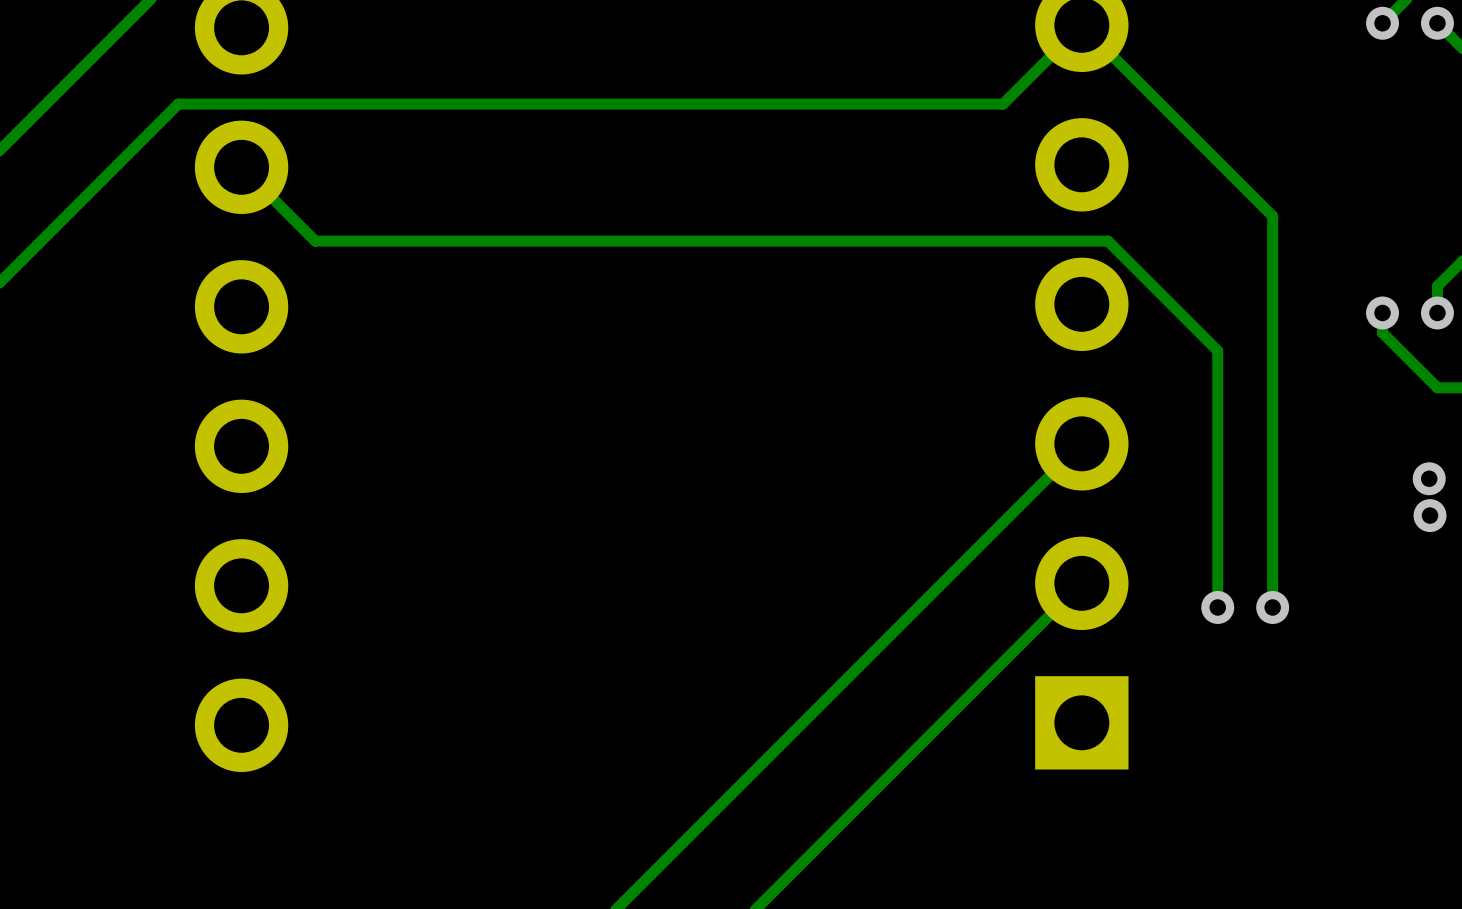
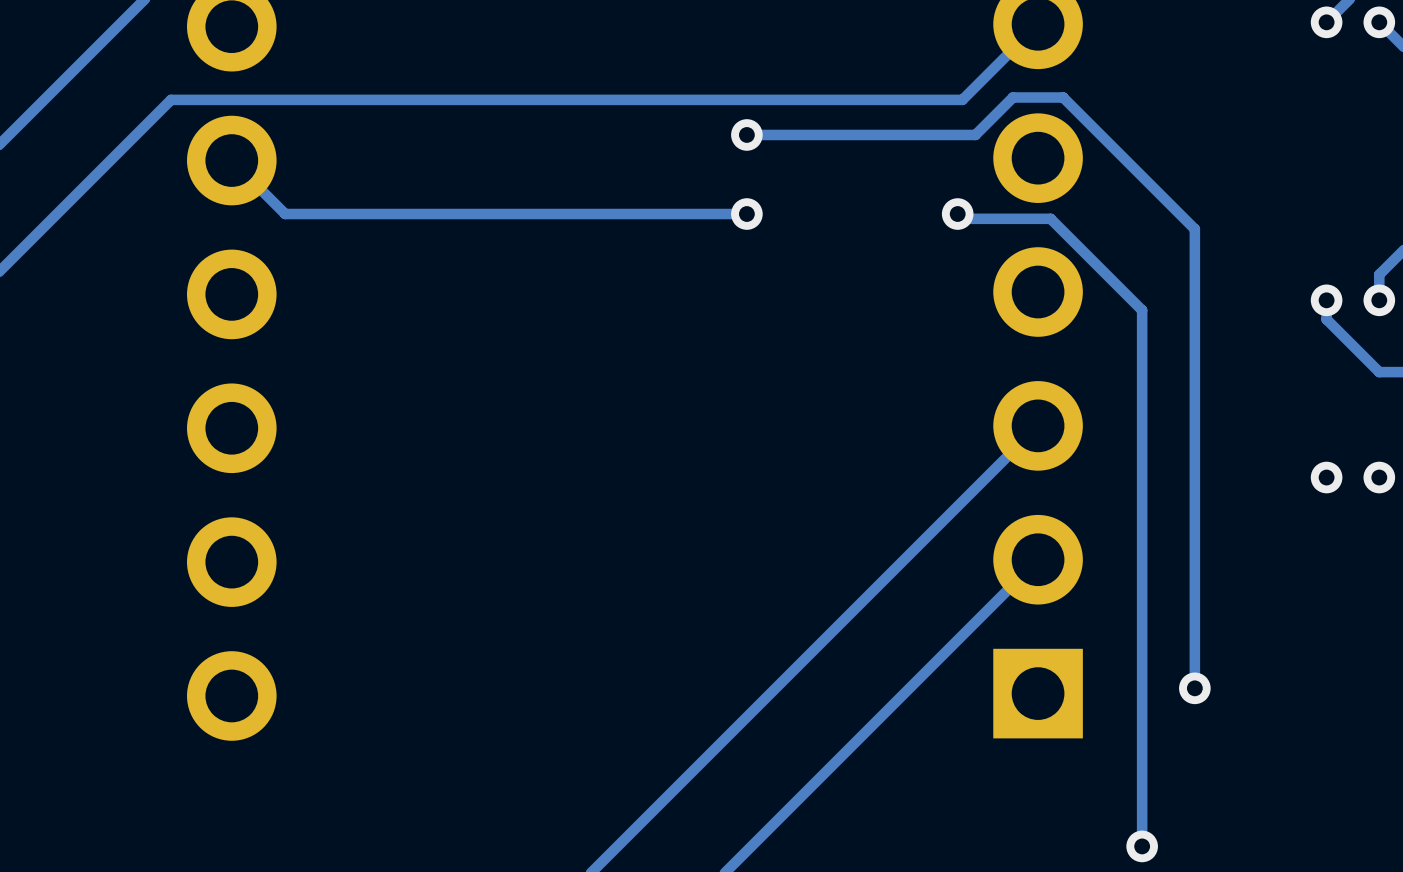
track: (1081, 25) (1272, 216) (1272, 607) -> none
track: none -> (746, 134) (975, 134) (1012, 97) (1063, 97) (1194, 229) (1194, 688)
via: none -> (746, 134)
track: (297, 223) (315, 241) (1108, 241) -> (285, 214) (746, 214)
via: none -> (746, 214)
track: none -> (957, 214) (962, 218) (1050, 218) (1063, 231)
via: none -> (957, 214)
track: (1190, 323) (1217, 350) (1217, 607) -> (1142, 310) (1142, 846)
via: (1429, 478) -> none
via: none -> (1326, 477)
via: none -> (1379, 477)
via: (1430, 515) -> none
via: (1217, 607) -> none
via: (1272, 607) -> none
via: none -> (1194, 688)
via: none -> (1142, 846)

